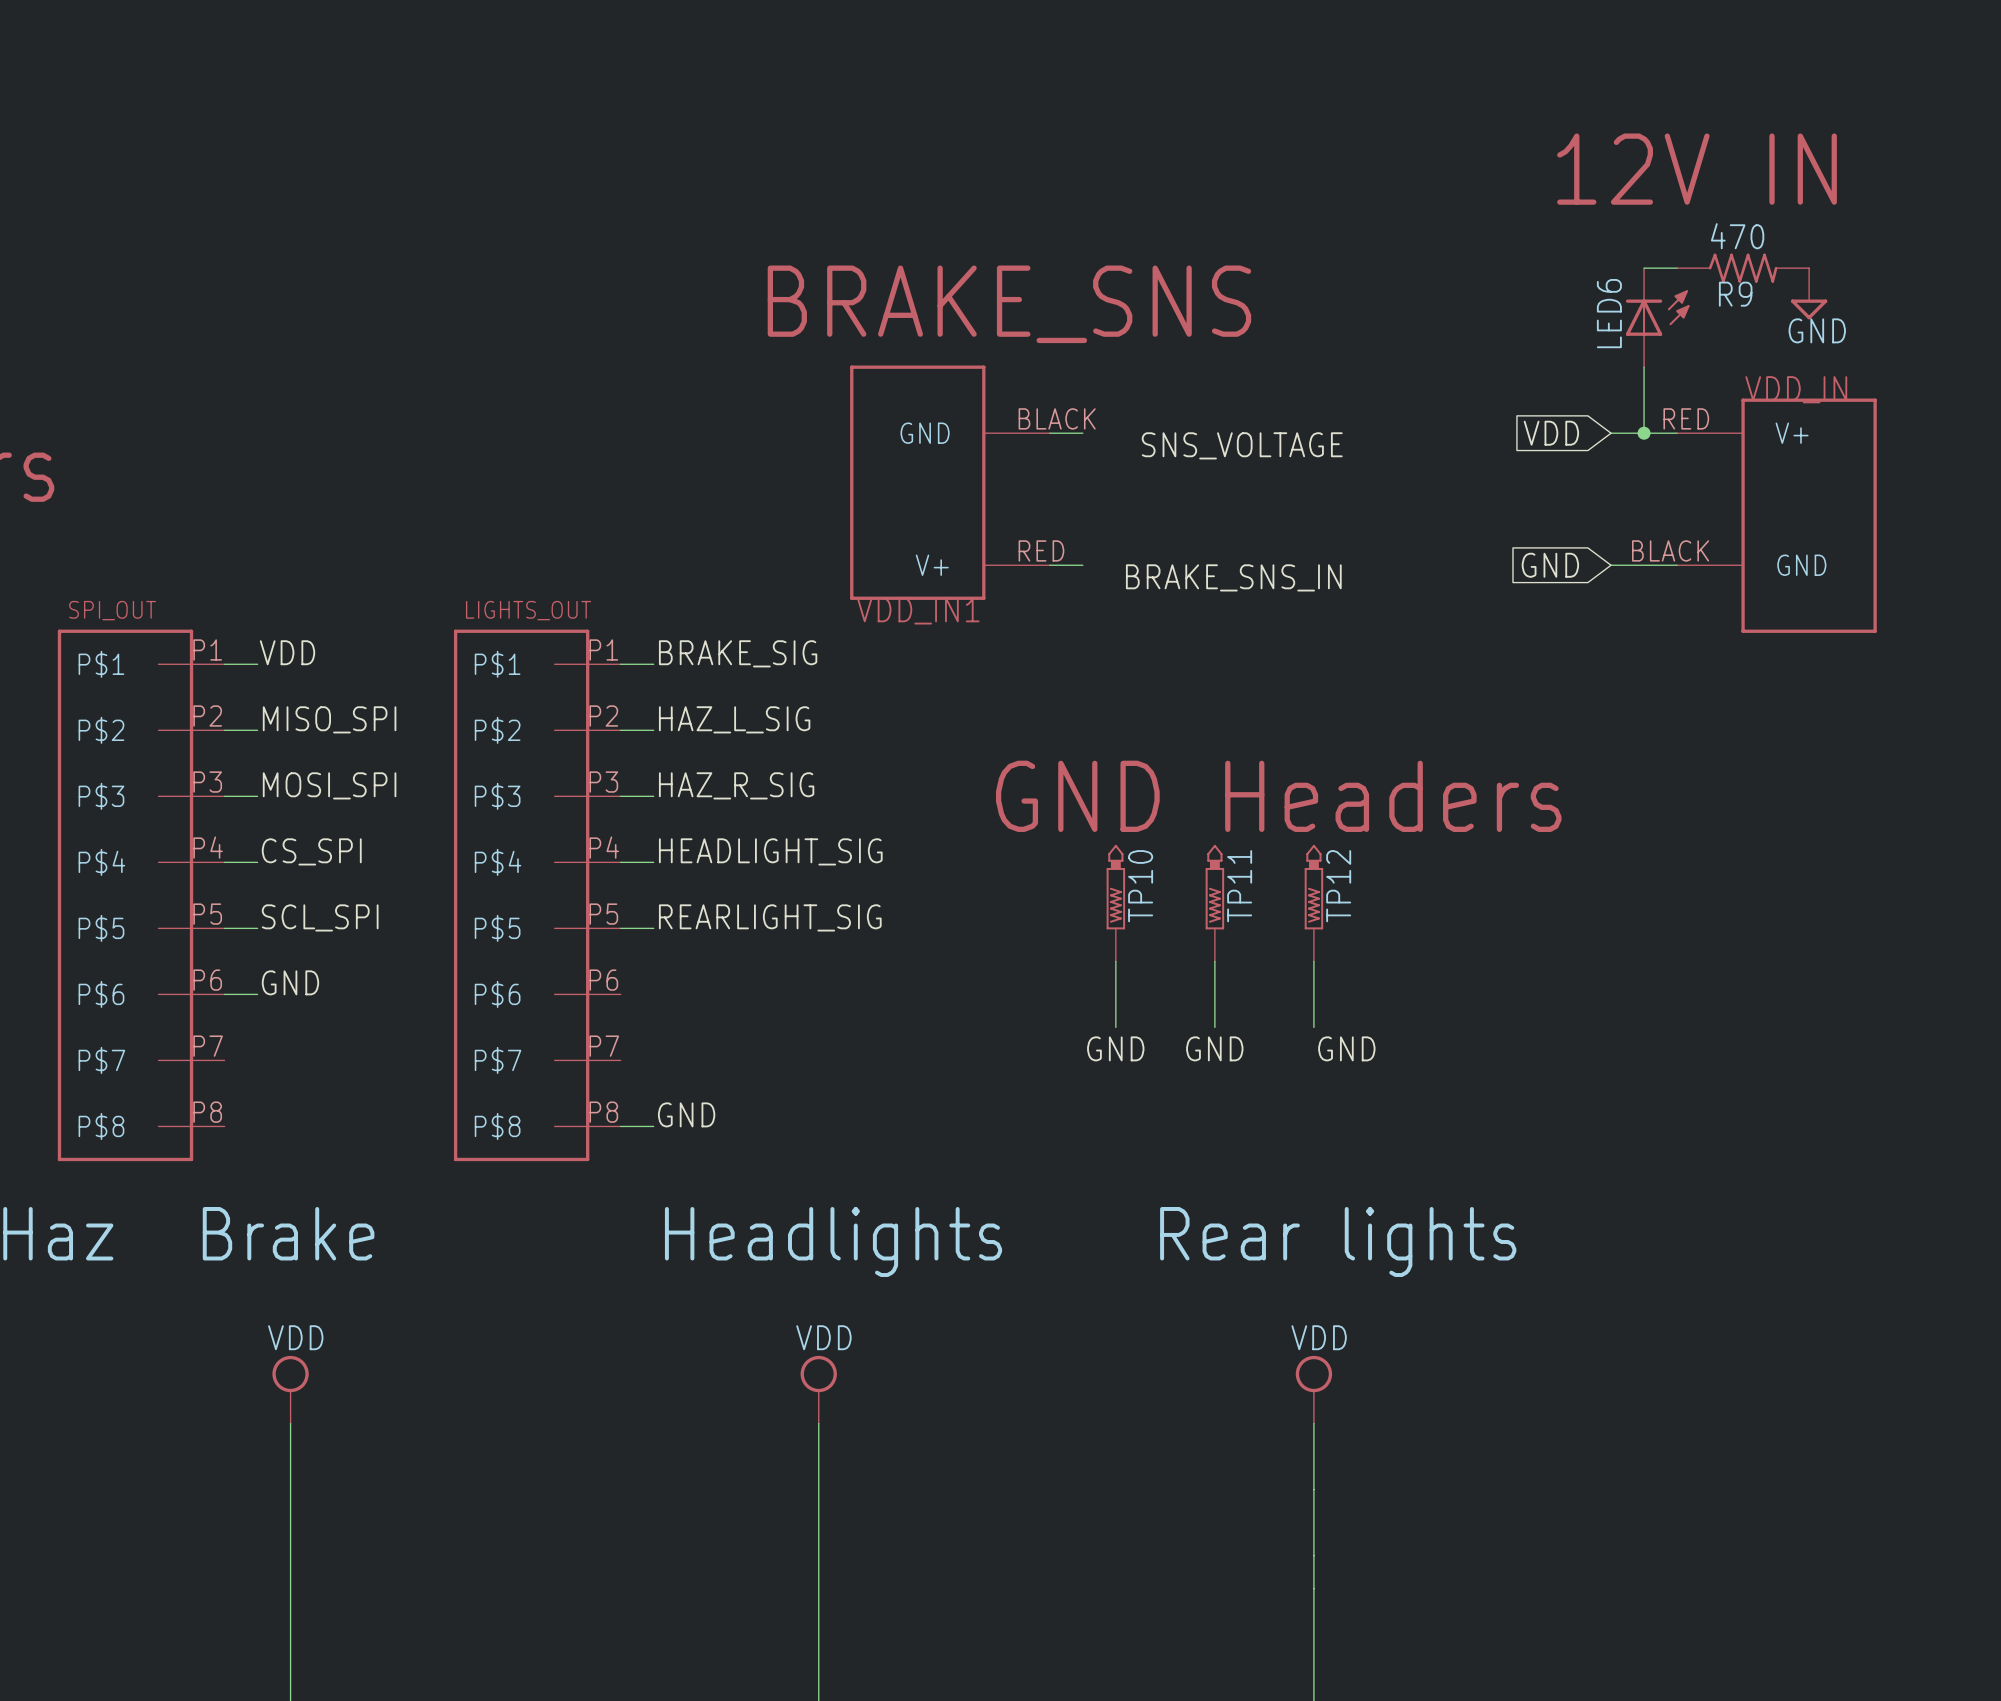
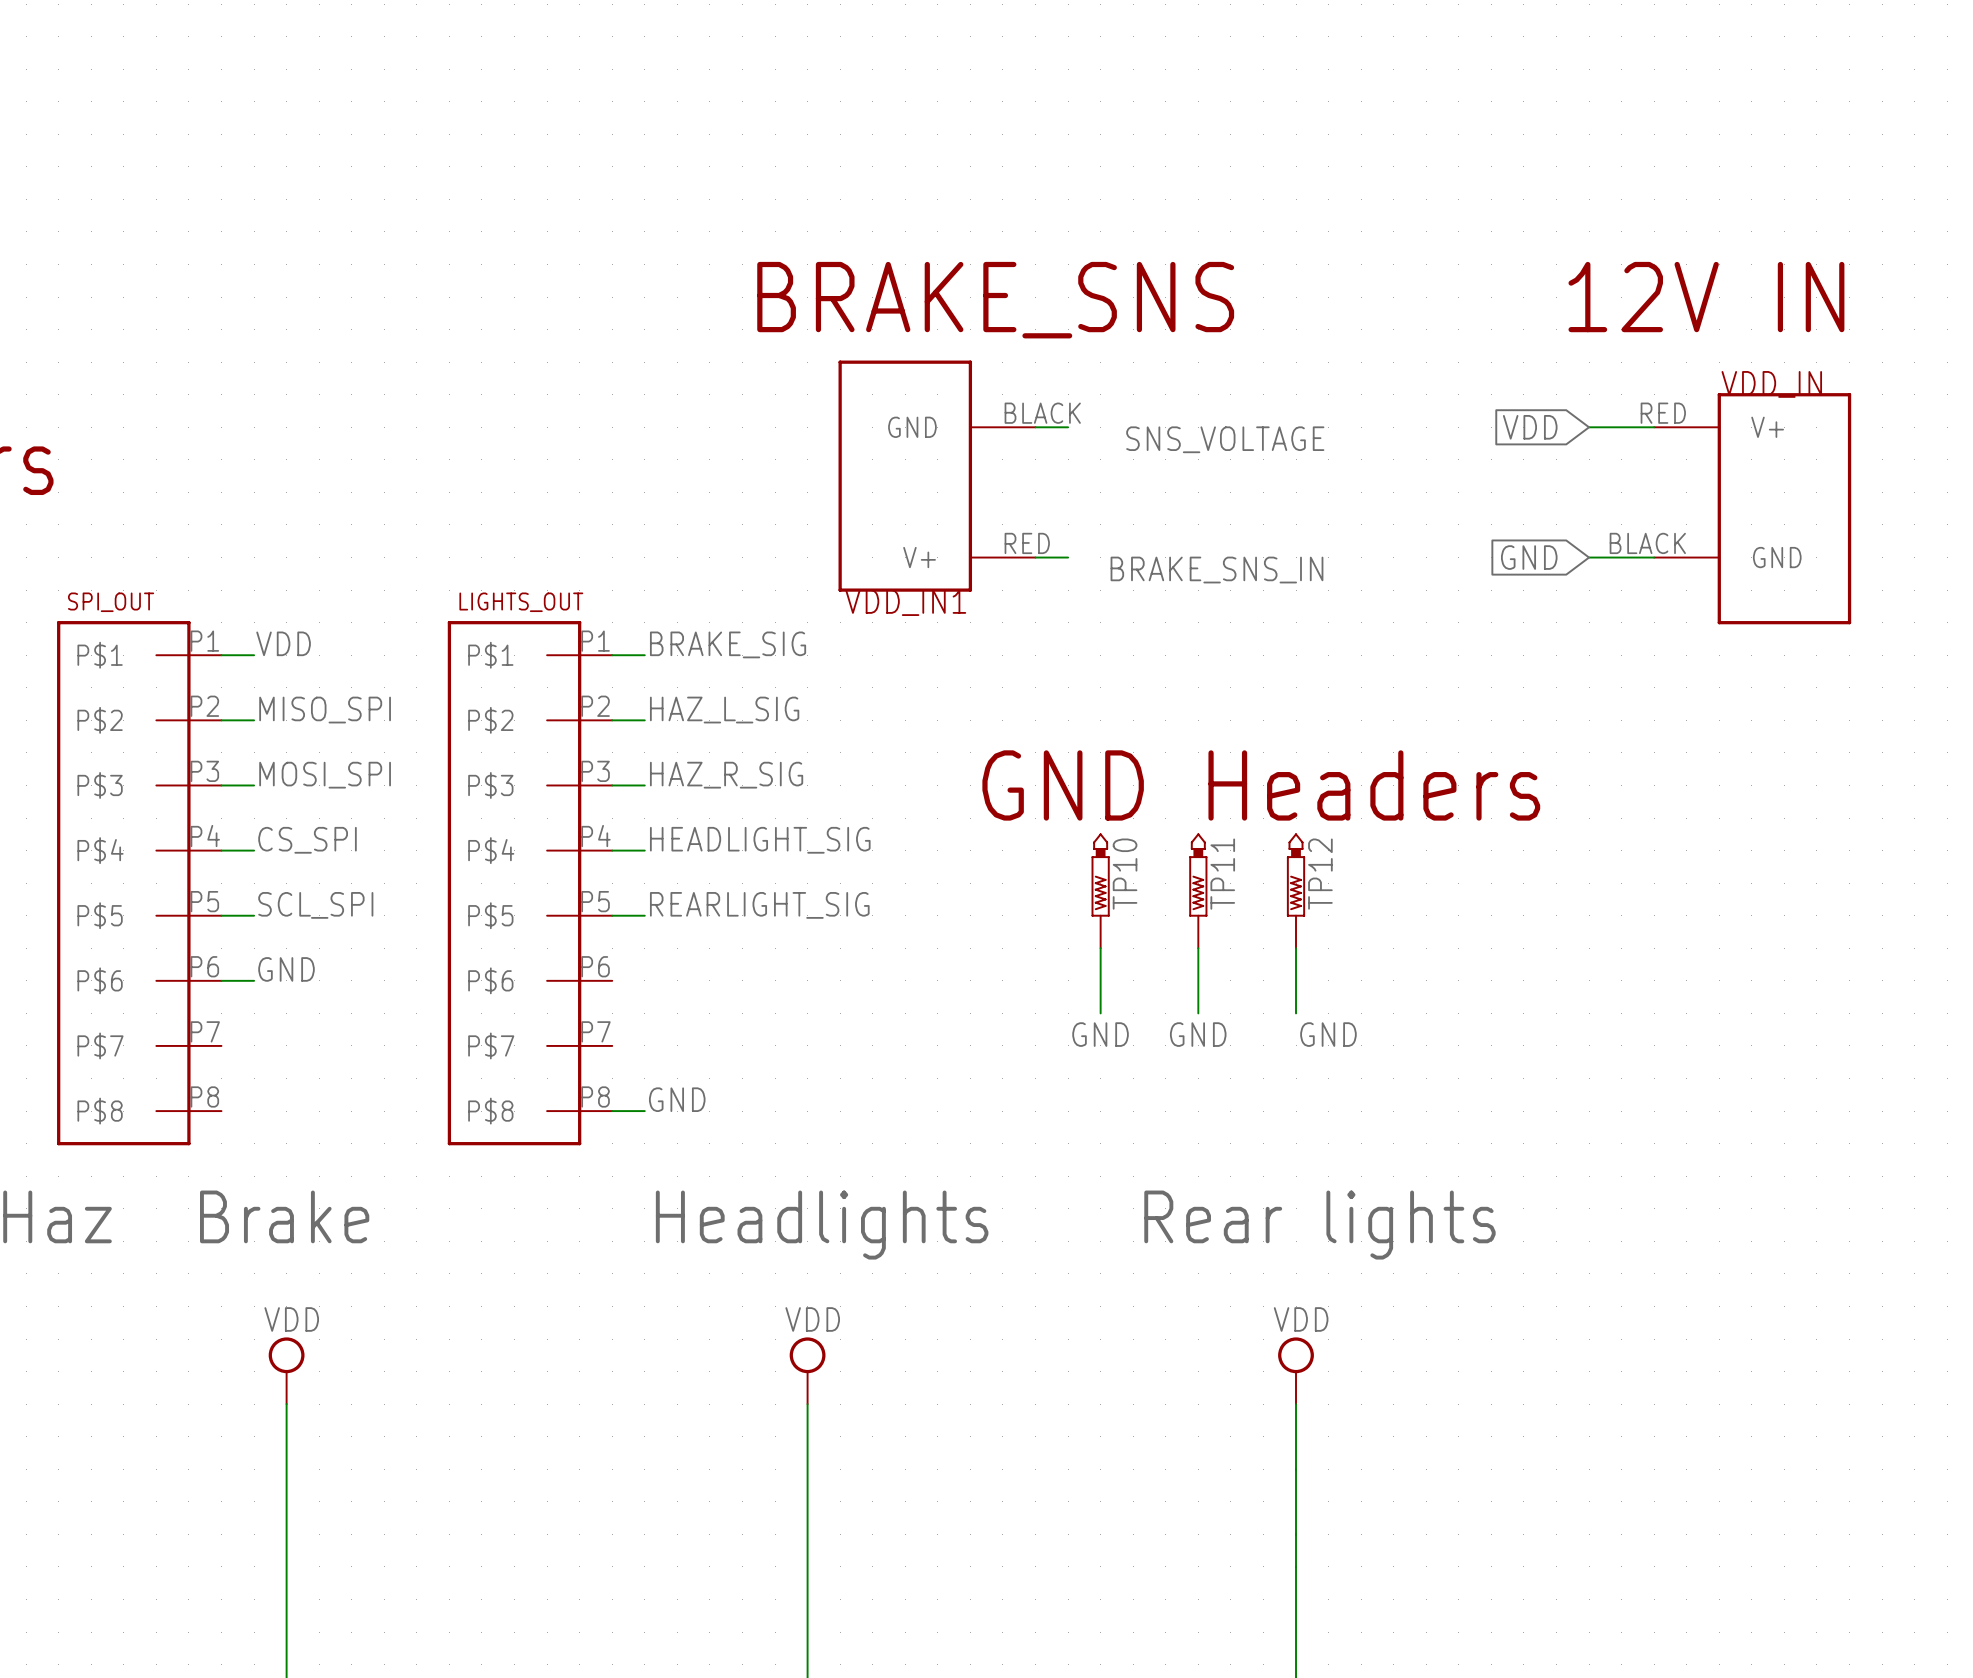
text position: 12V IN (1697, 169) -> 12V IN (1706, 297)
R9: 470 (1743, 268) -> none
power symbol: GND (1809, 293) -> none
LED6: (1657, 317) -> none
wire: (1644, 367) (1644, 433) -> none
junction: (1644, 433) -> none

